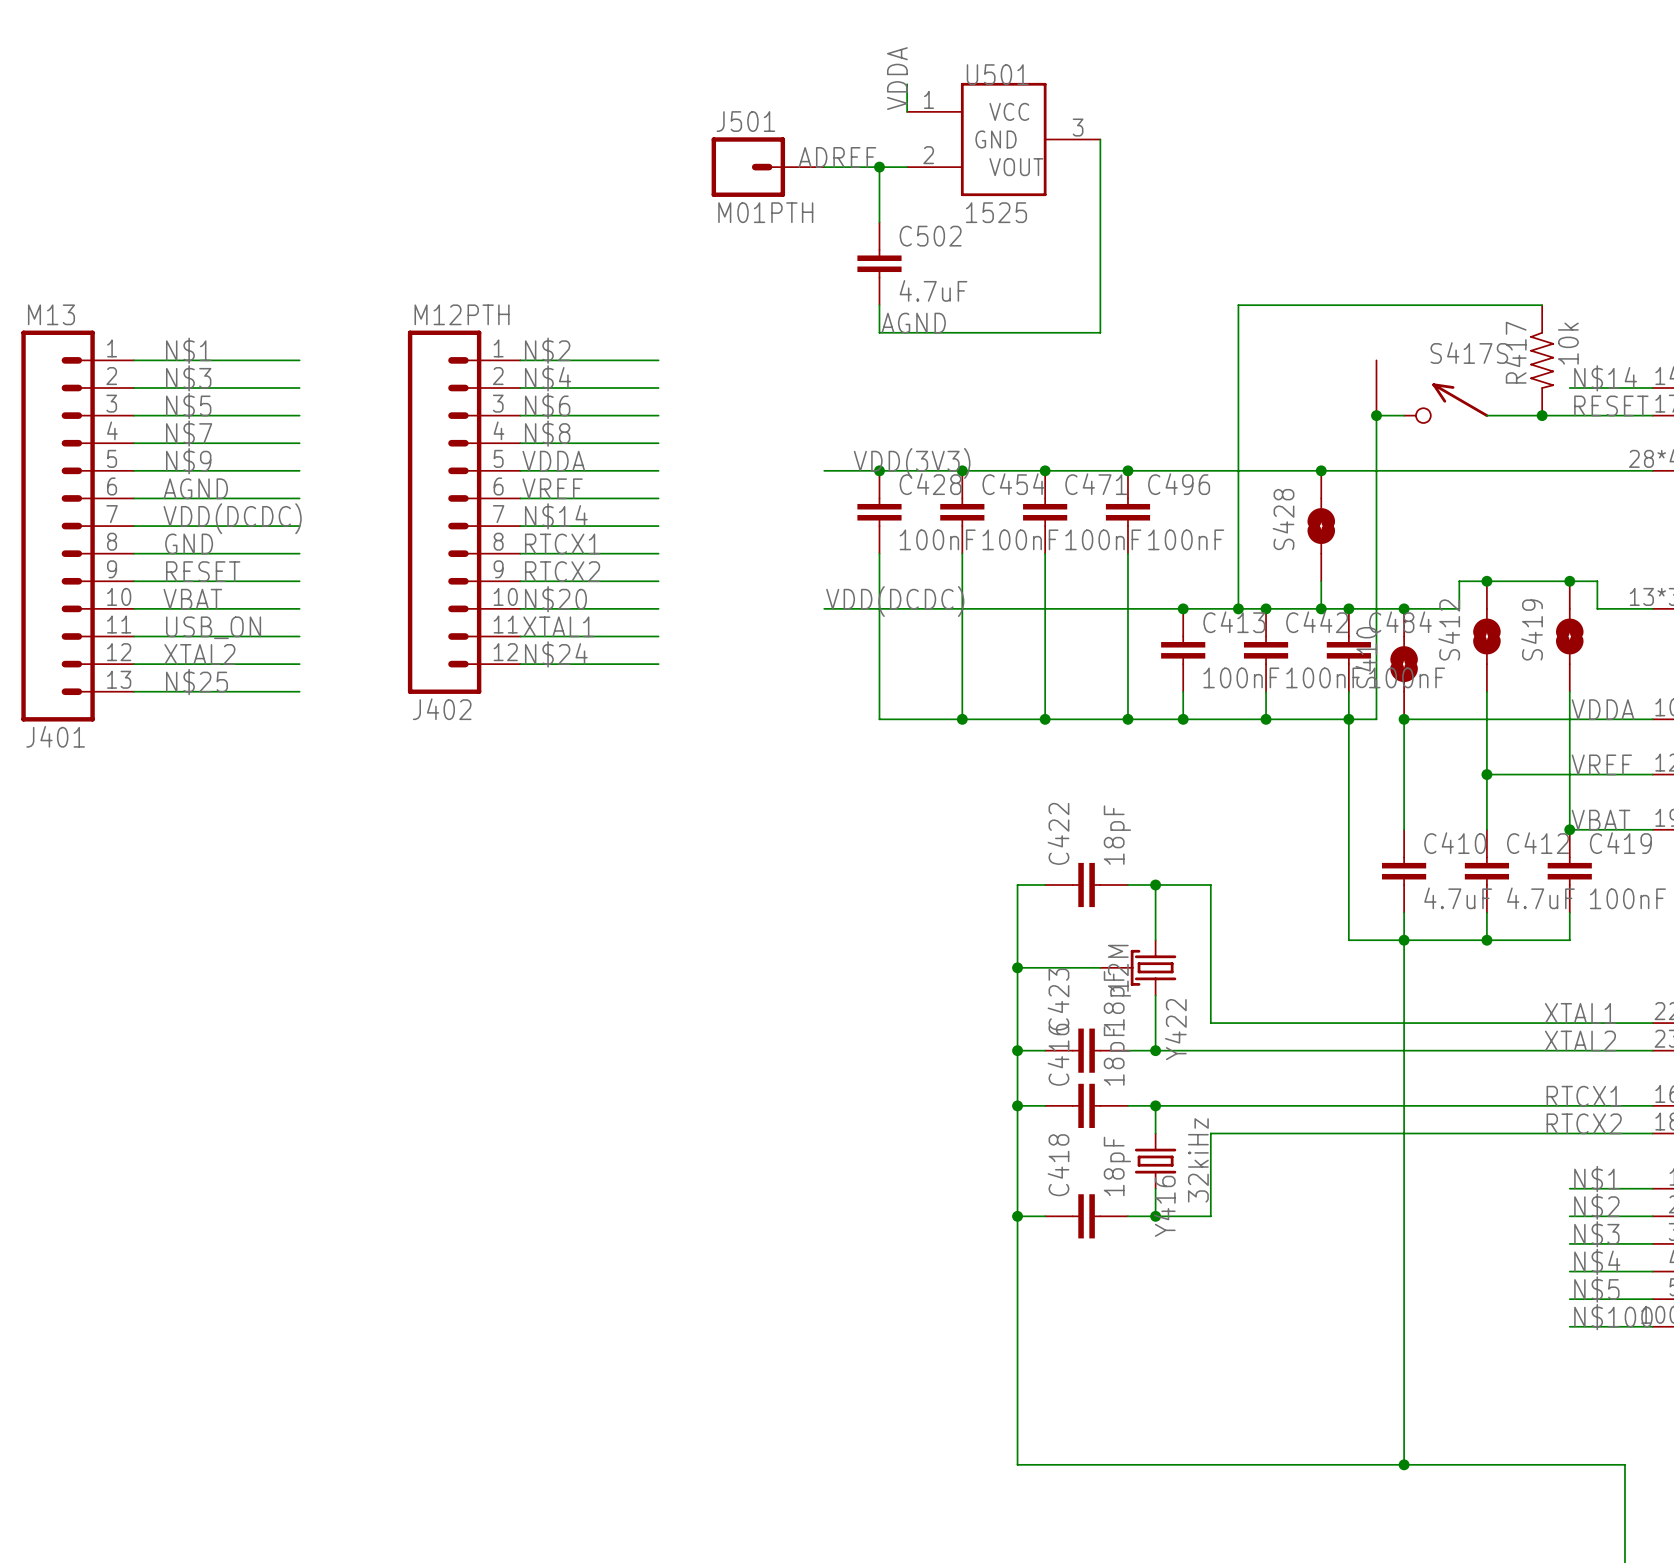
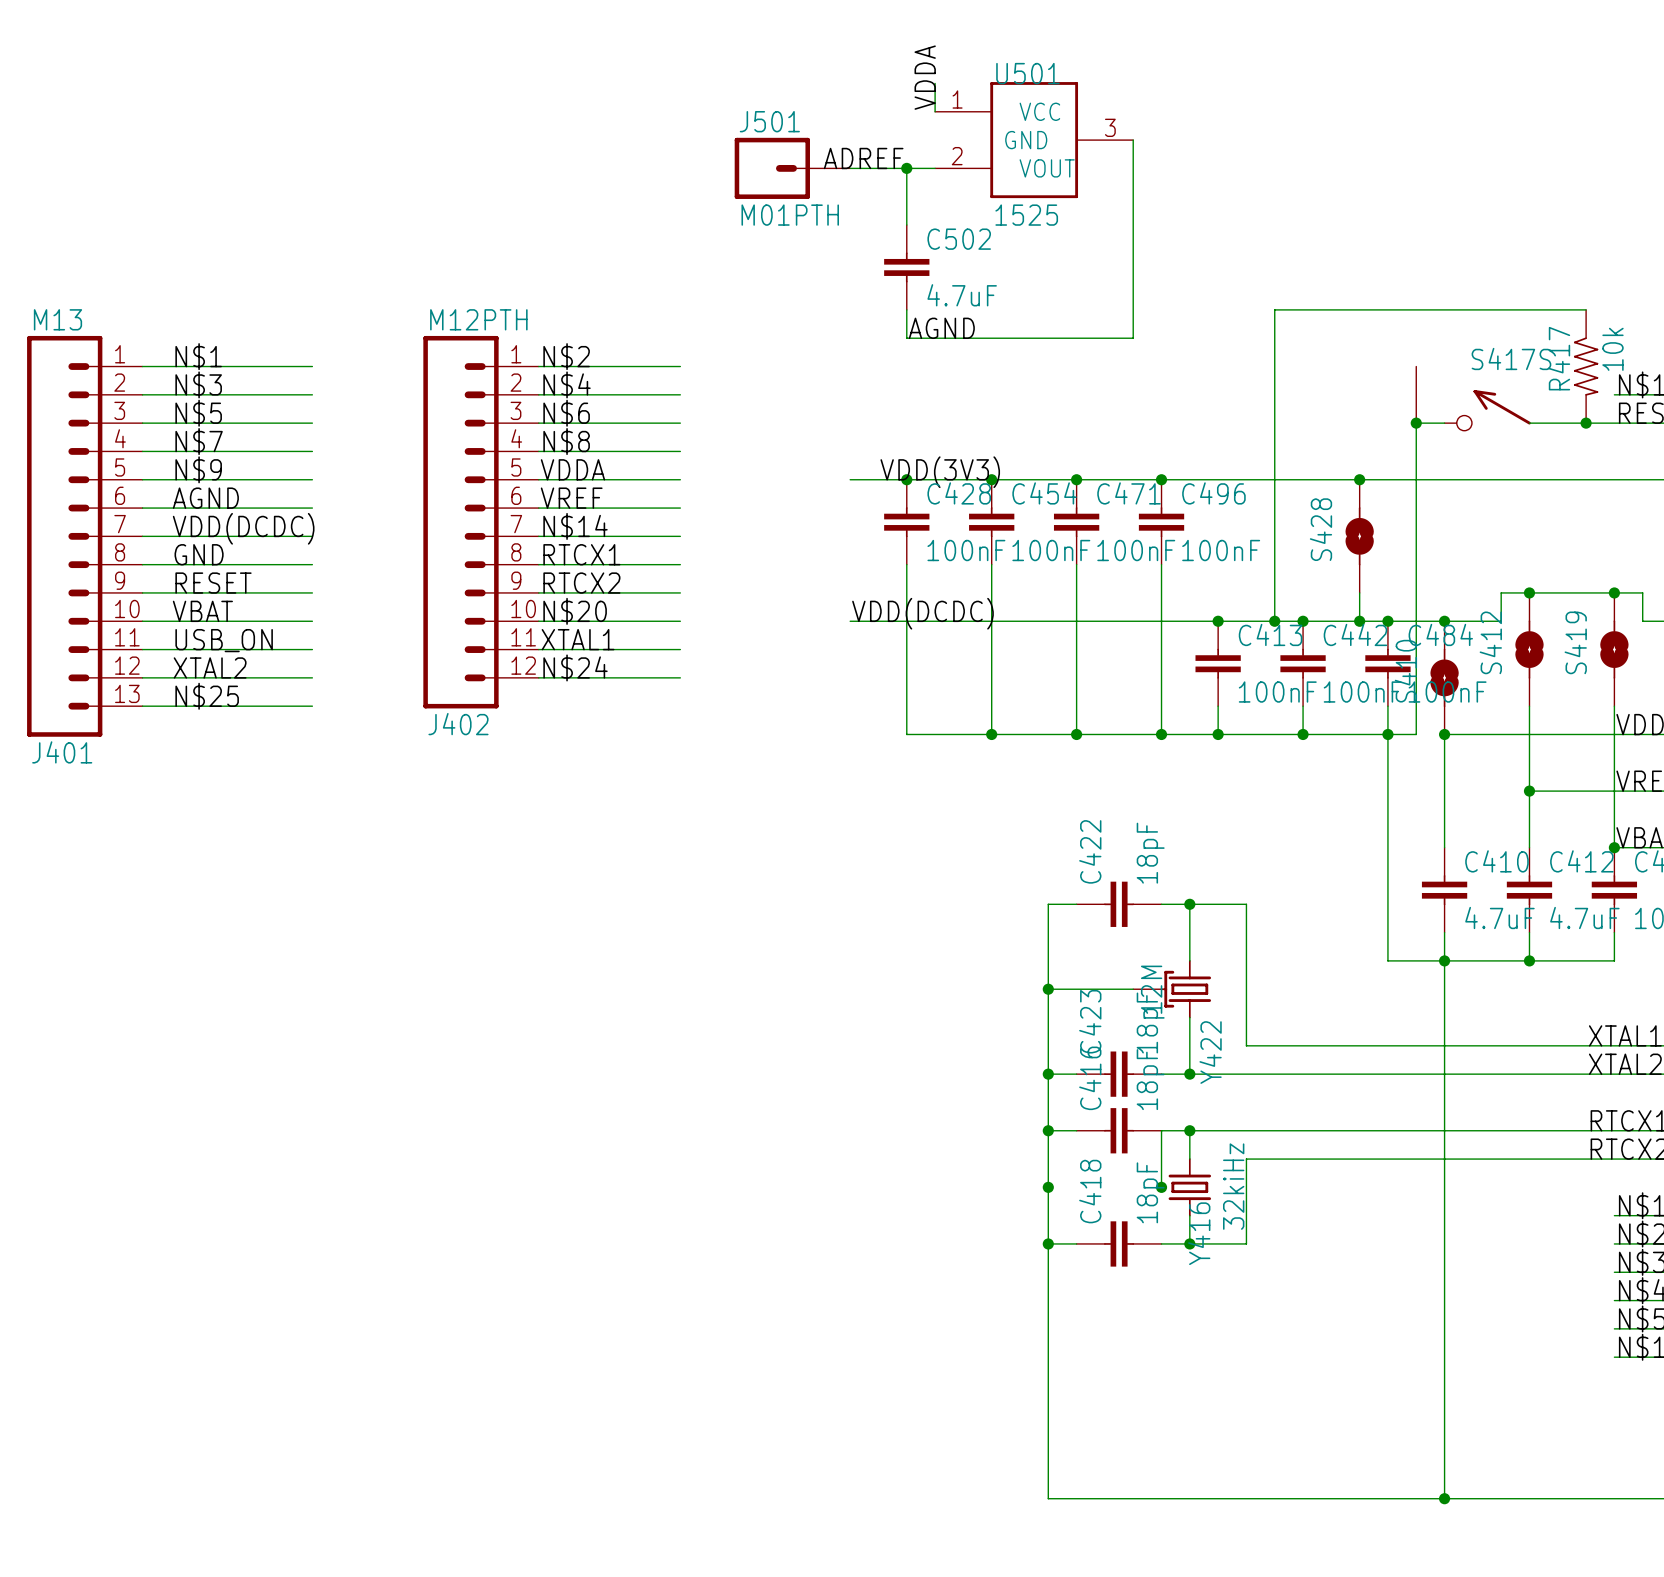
wire: none -> (1161, 1130) (1161, 1187)
junction: none -> (1048, 1187)
junction: none -> (1161, 1187)

